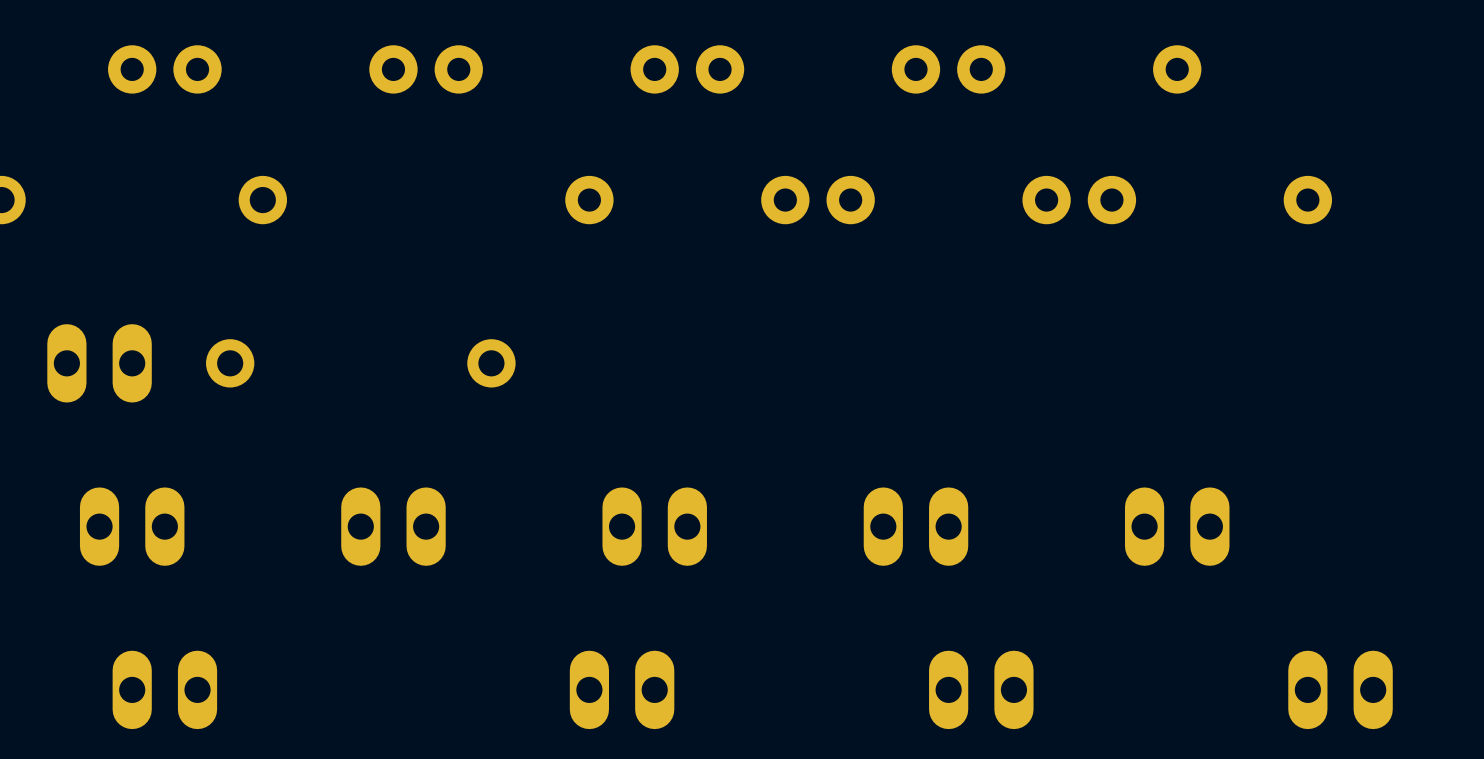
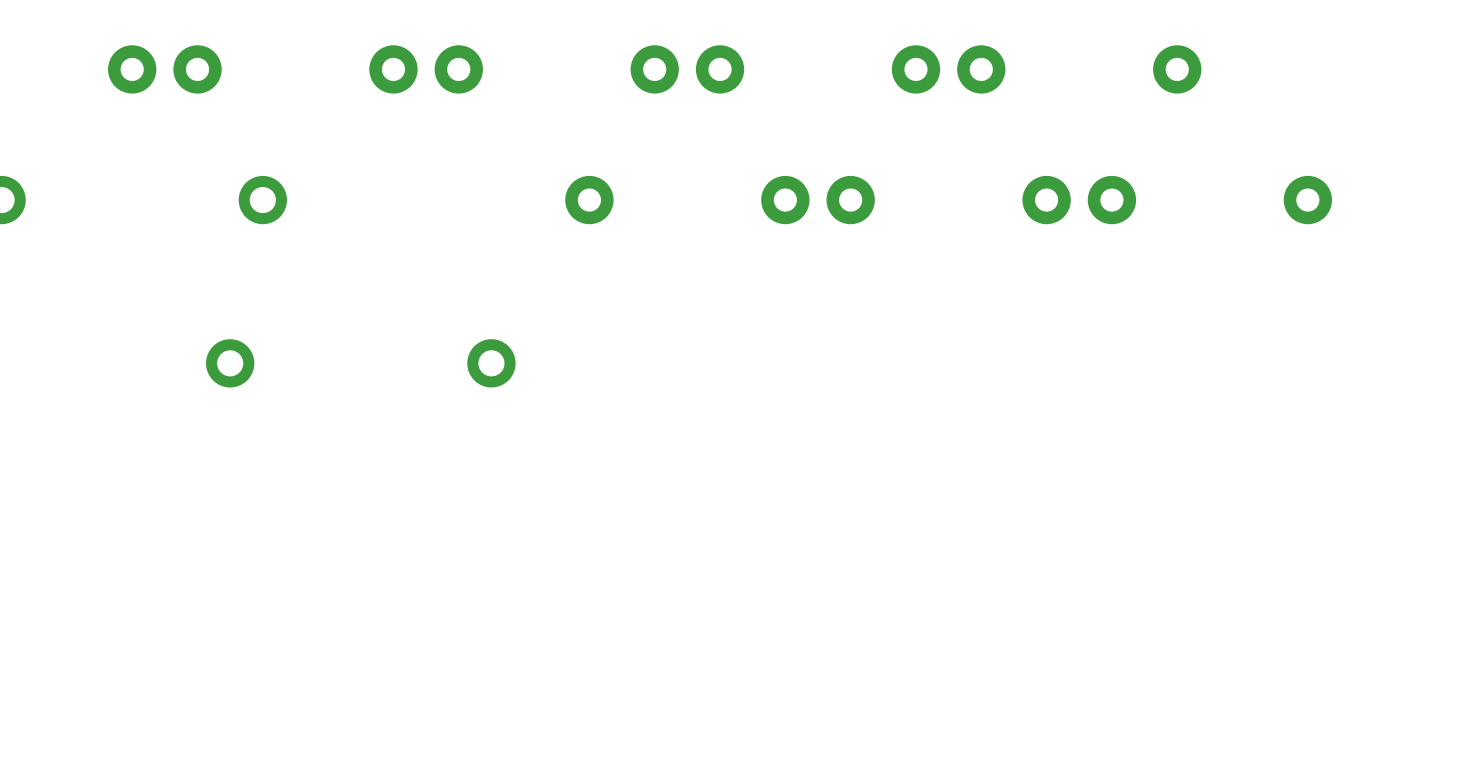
part: (99, 363) -> none
part: (132, 526) -> none
part: (393, 526) -> none
part: (654, 526) -> none
part: (915, 526) -> none
part: (1177, 526) -> none
part: (164, 689) -> none
part: (622, 689) -> none
part: (981, 689) -> none
part: (1340, 689) -> none

